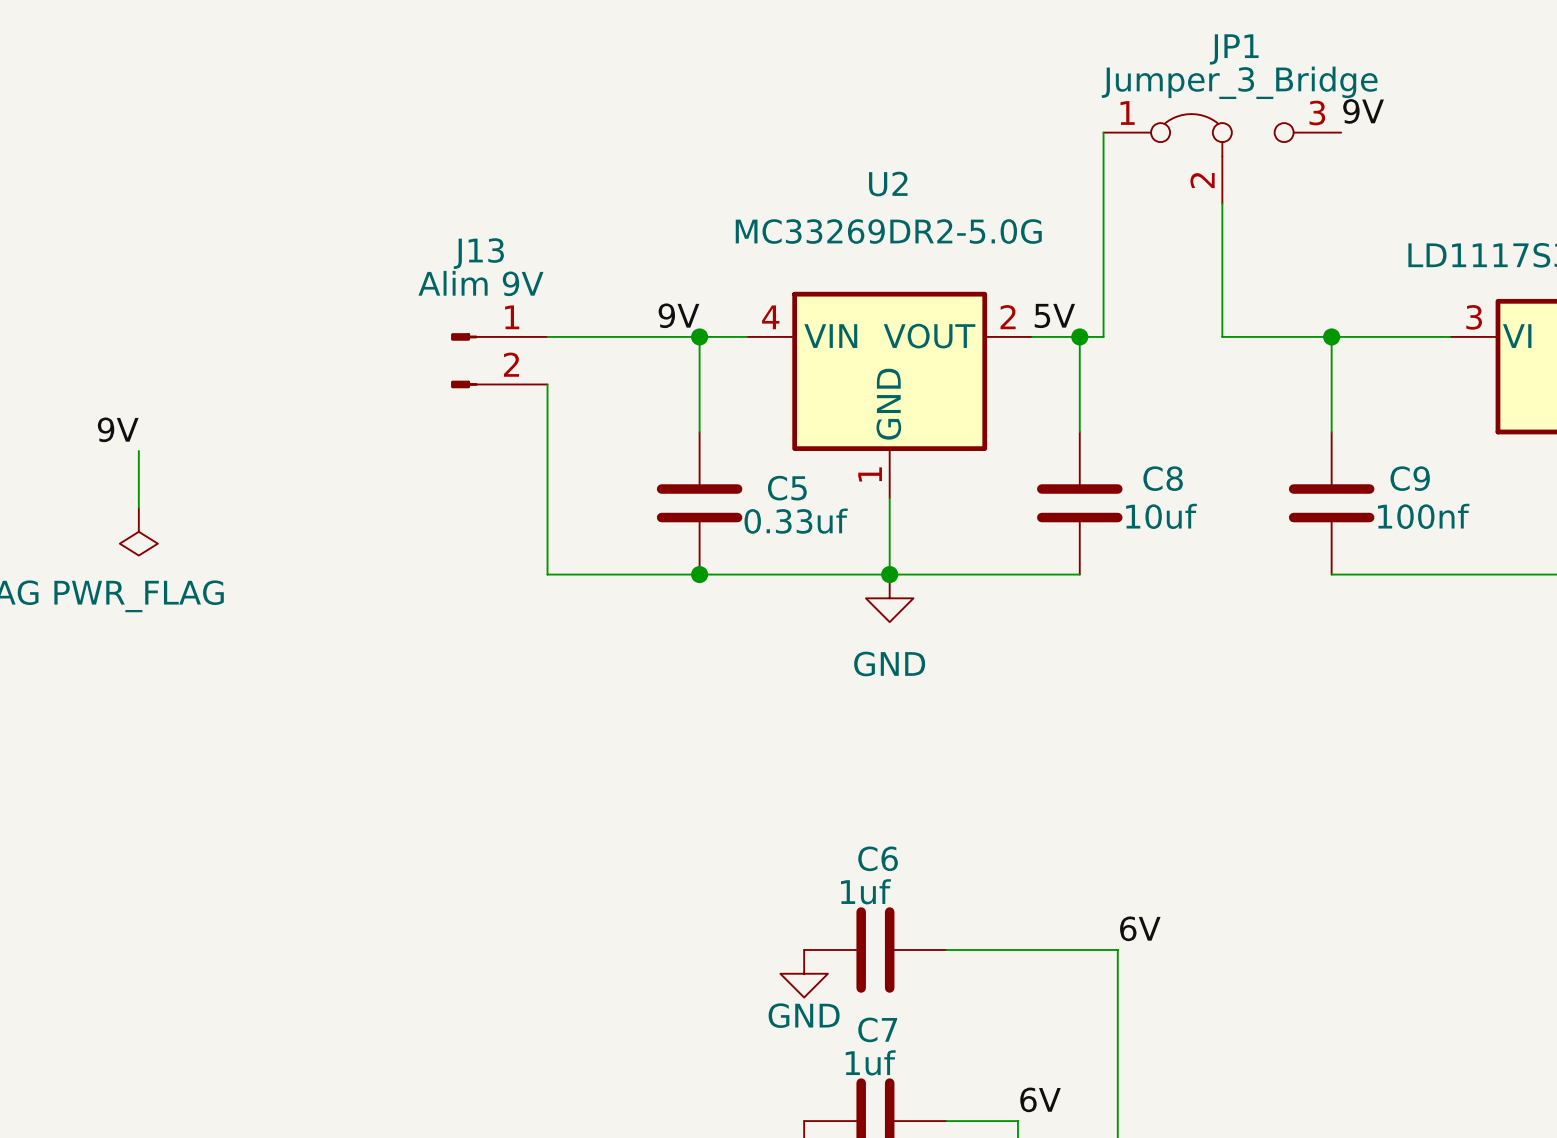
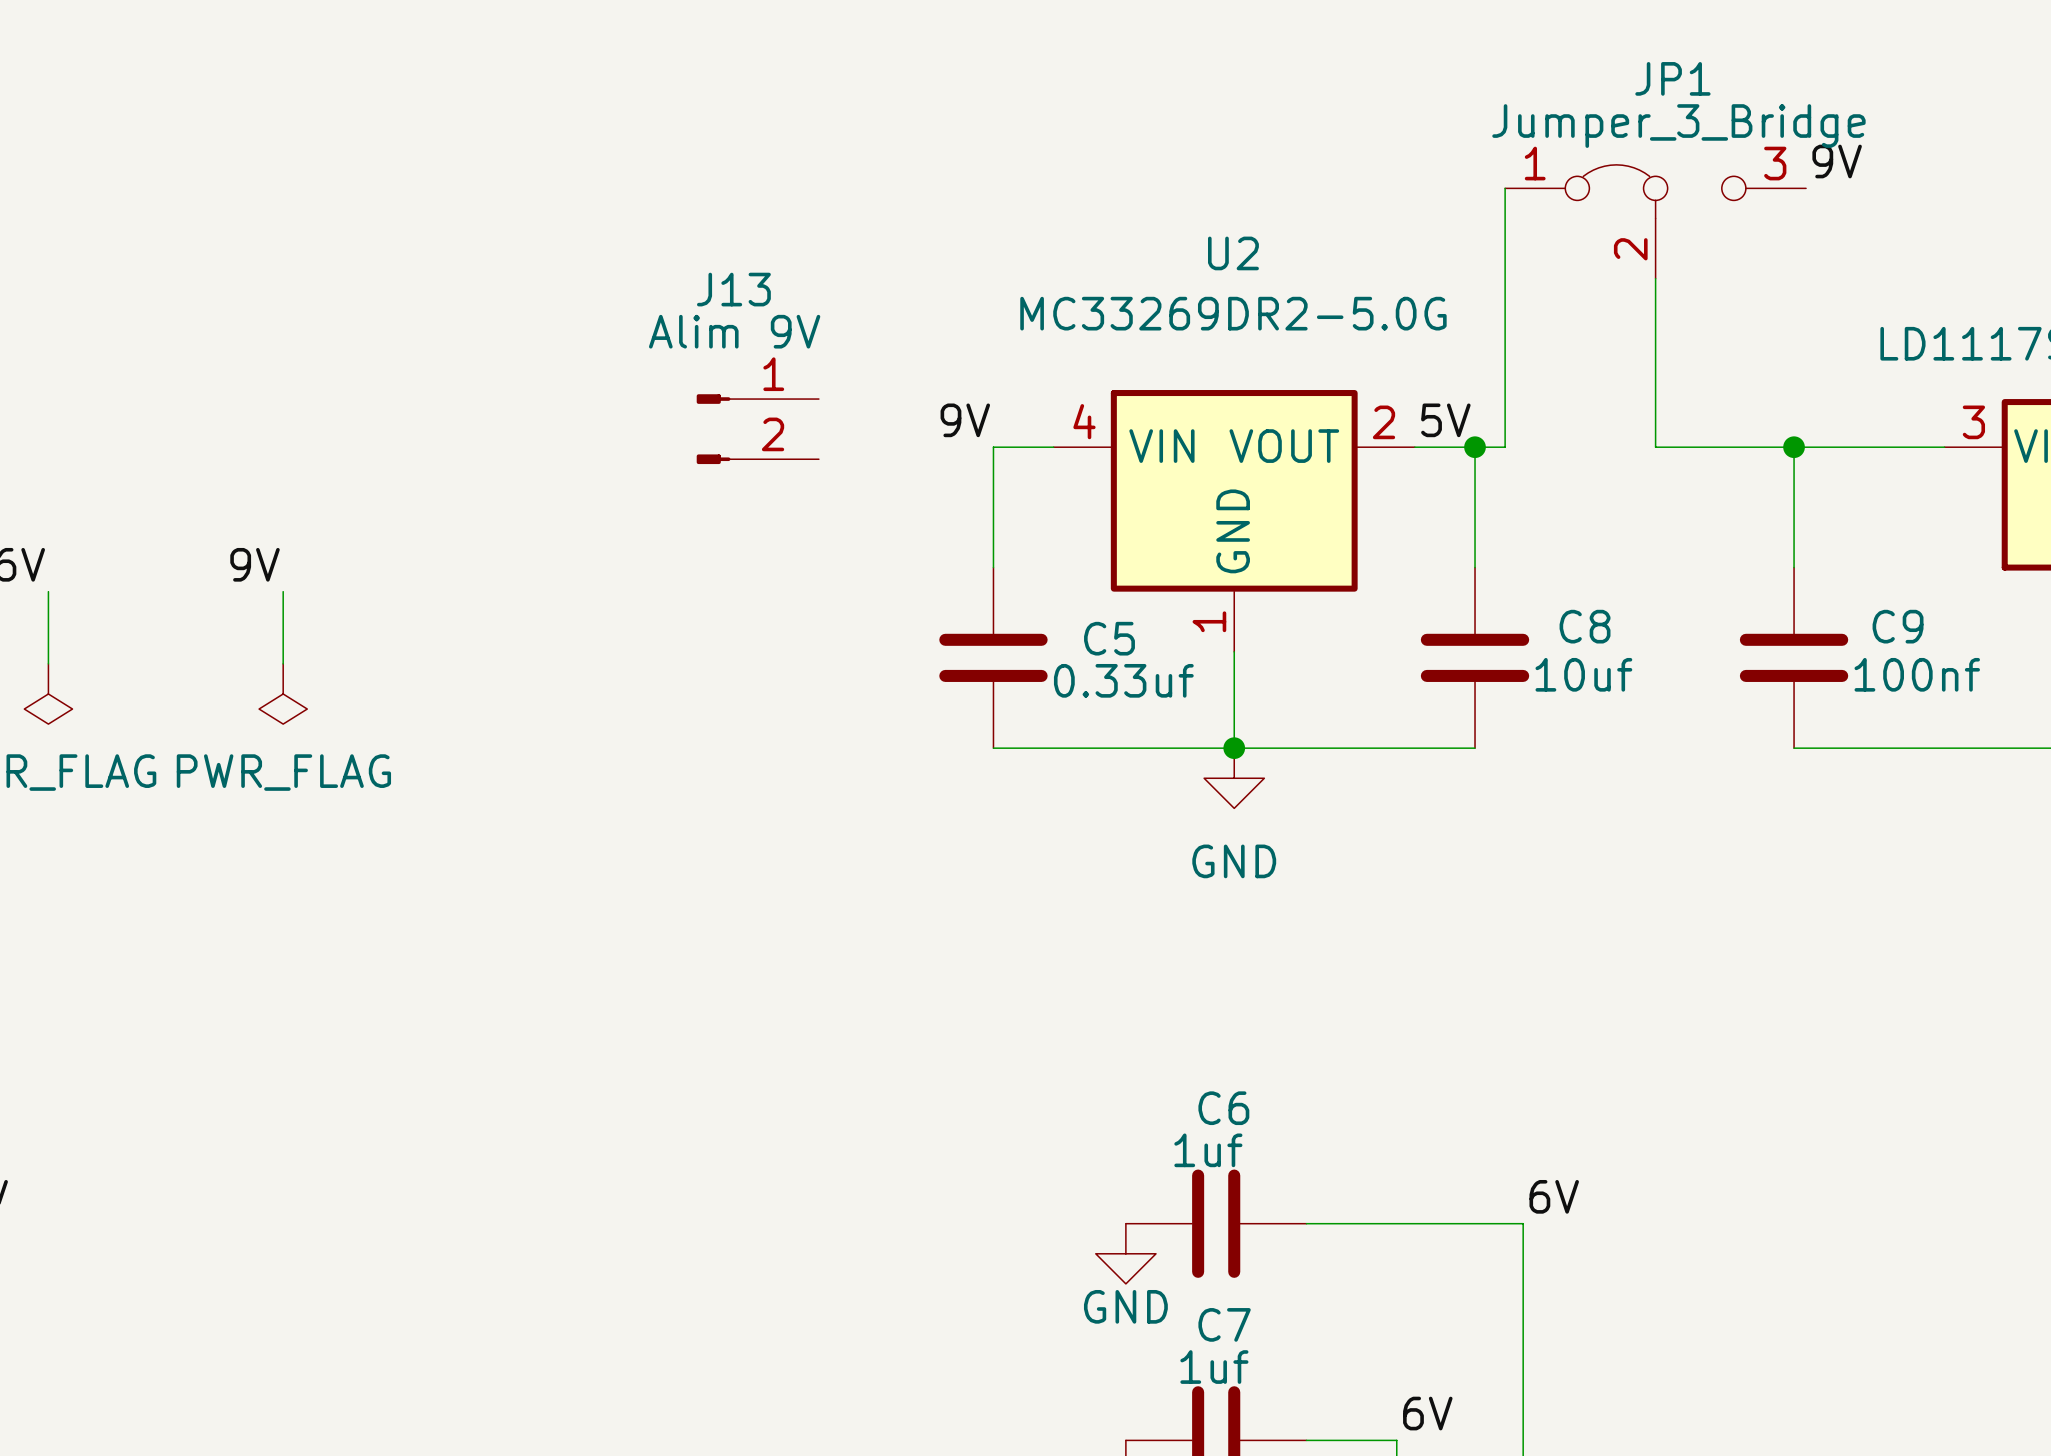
wire: (547, 336) (699, 336) -> none
junction: (699, 336) -> none
J13 position: (499, 360) -> (757, 429)
wire: (547, 384) (547, 574) (699, 574) -> none
junction: (699, 574) -> none

